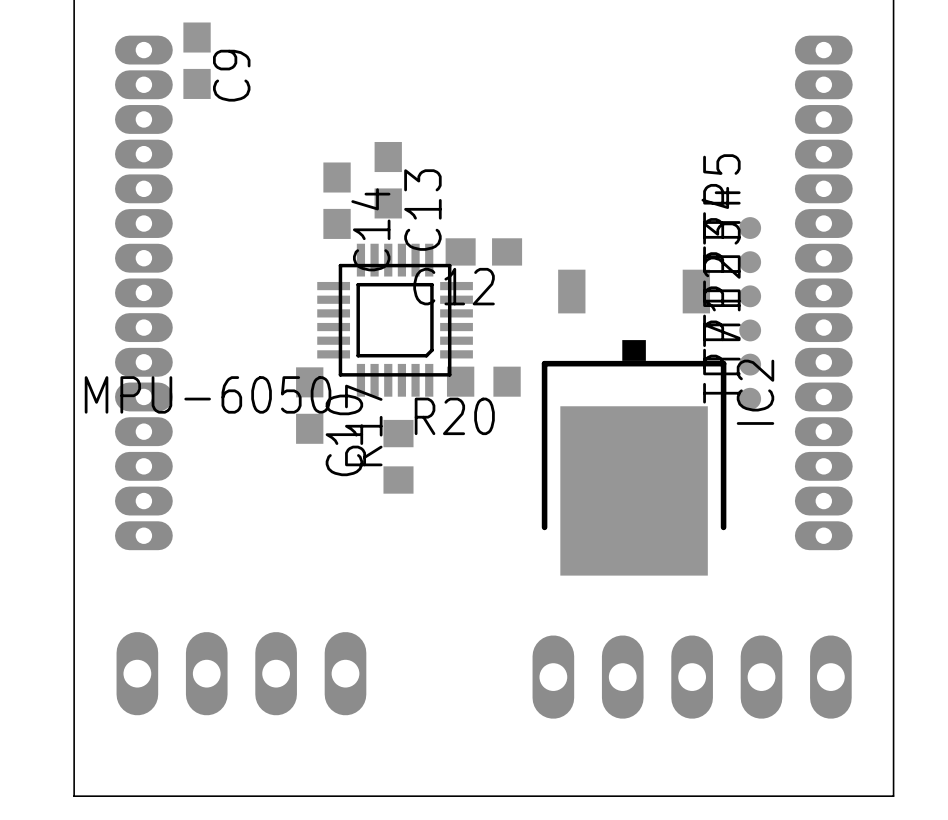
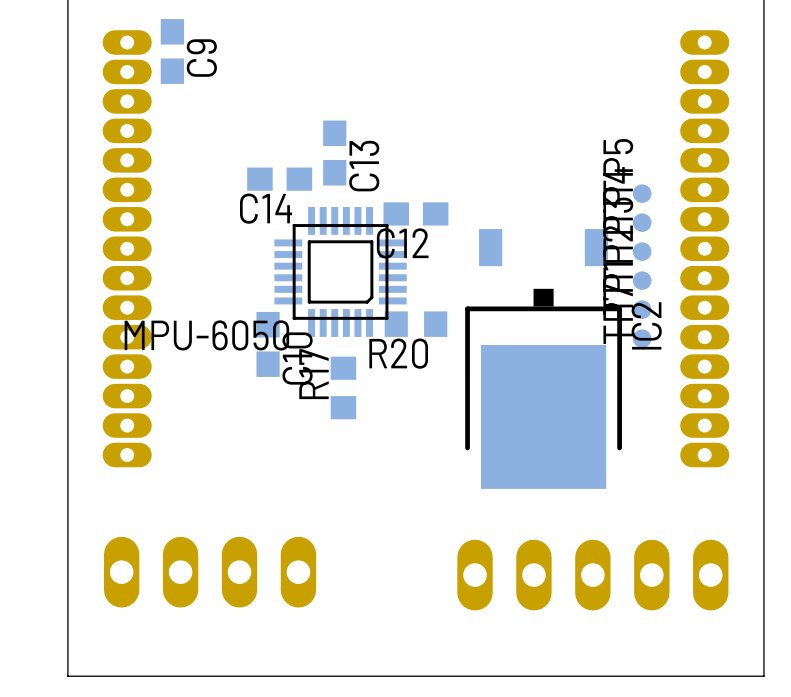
C14 rotation: 0° (337, 200) -> 90° clockwise (279, 179)

